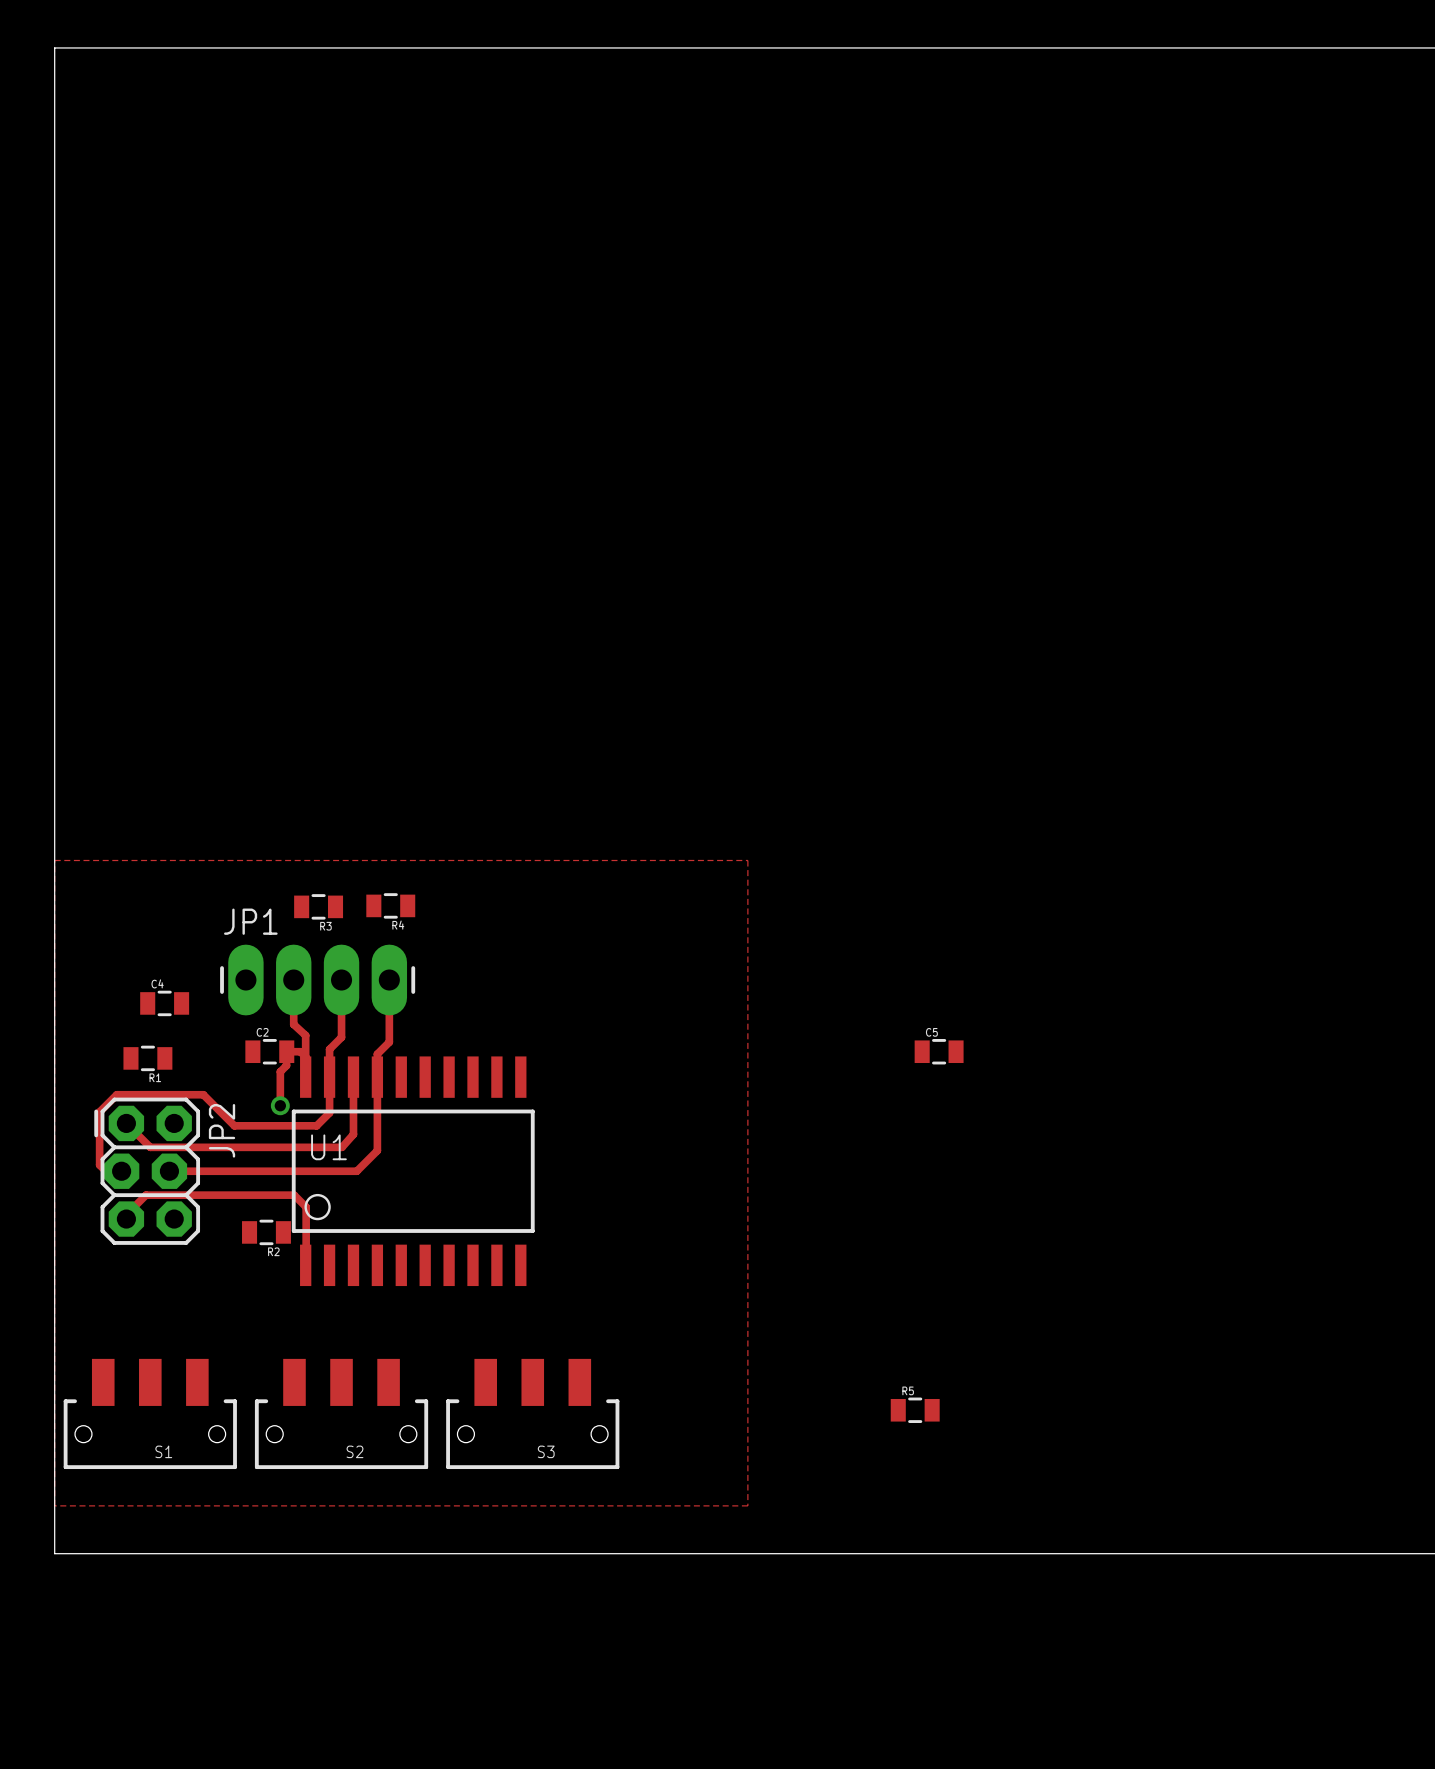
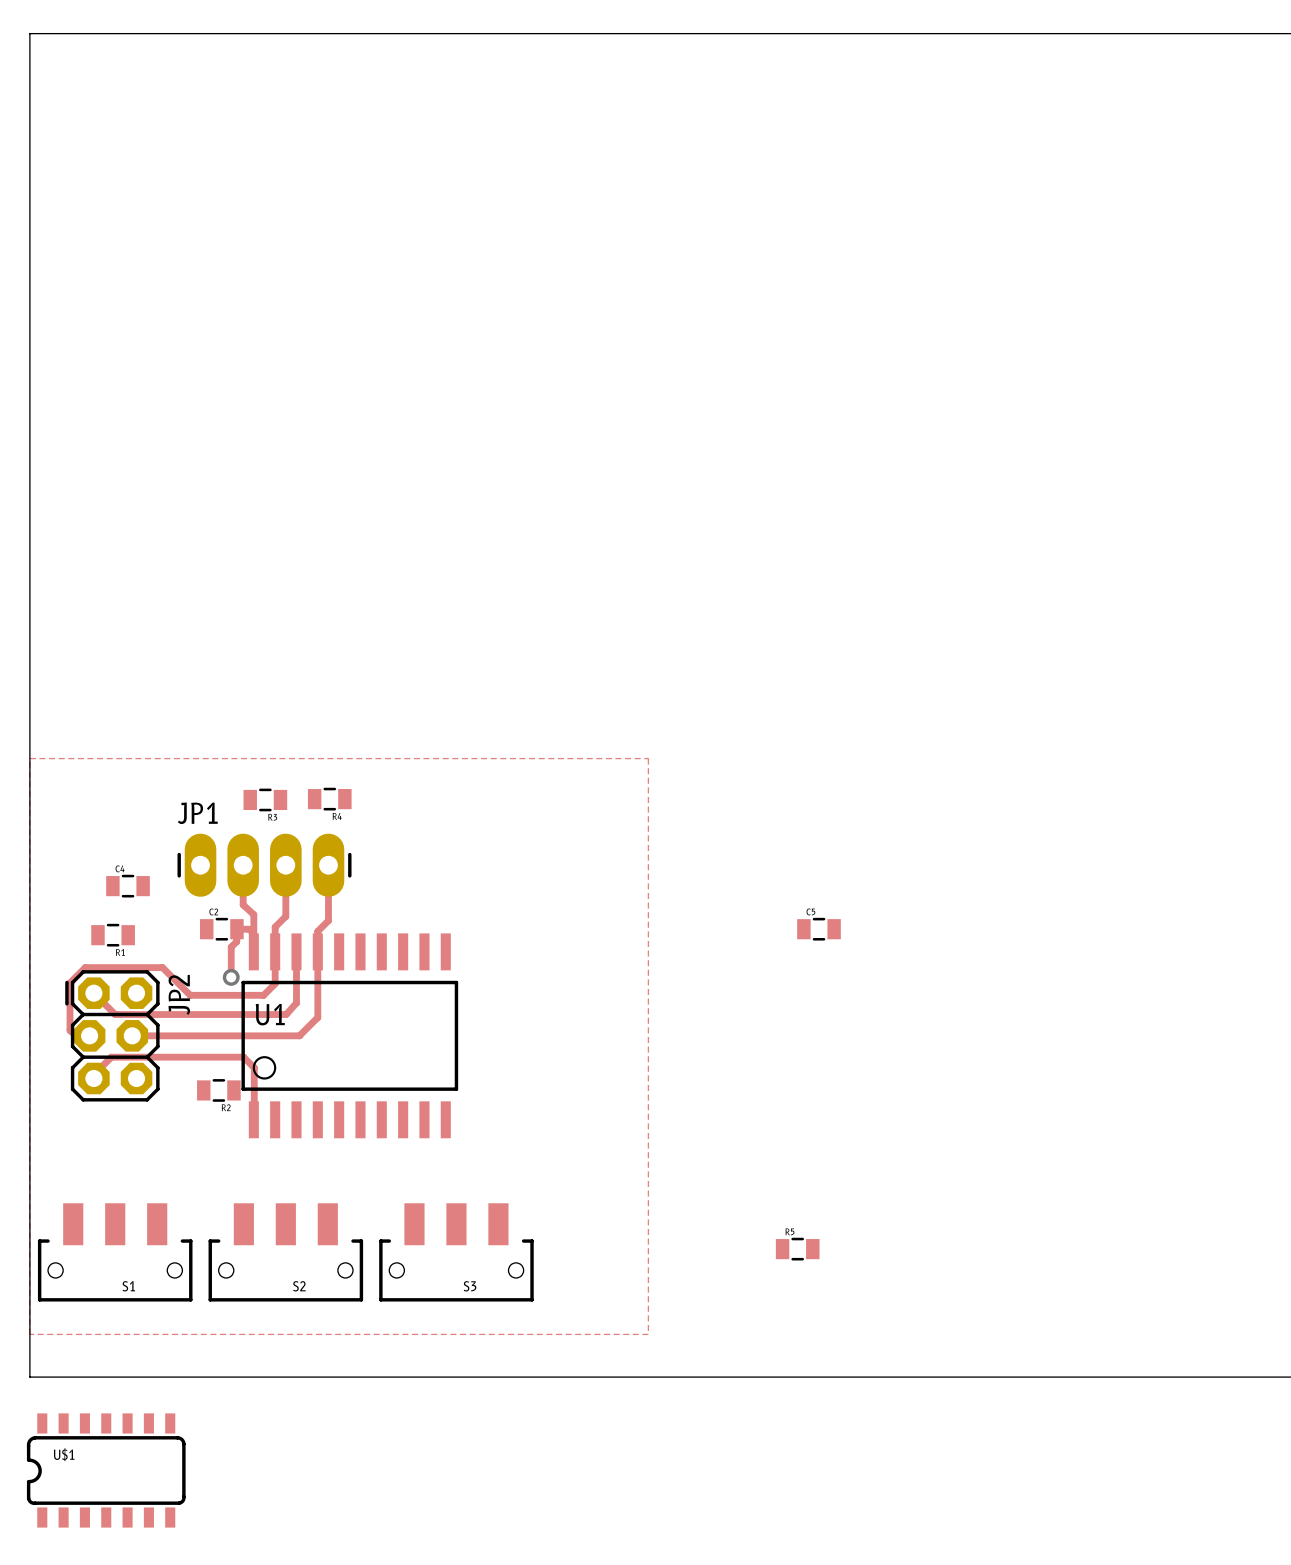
U$1: none -> (106, 1470)

